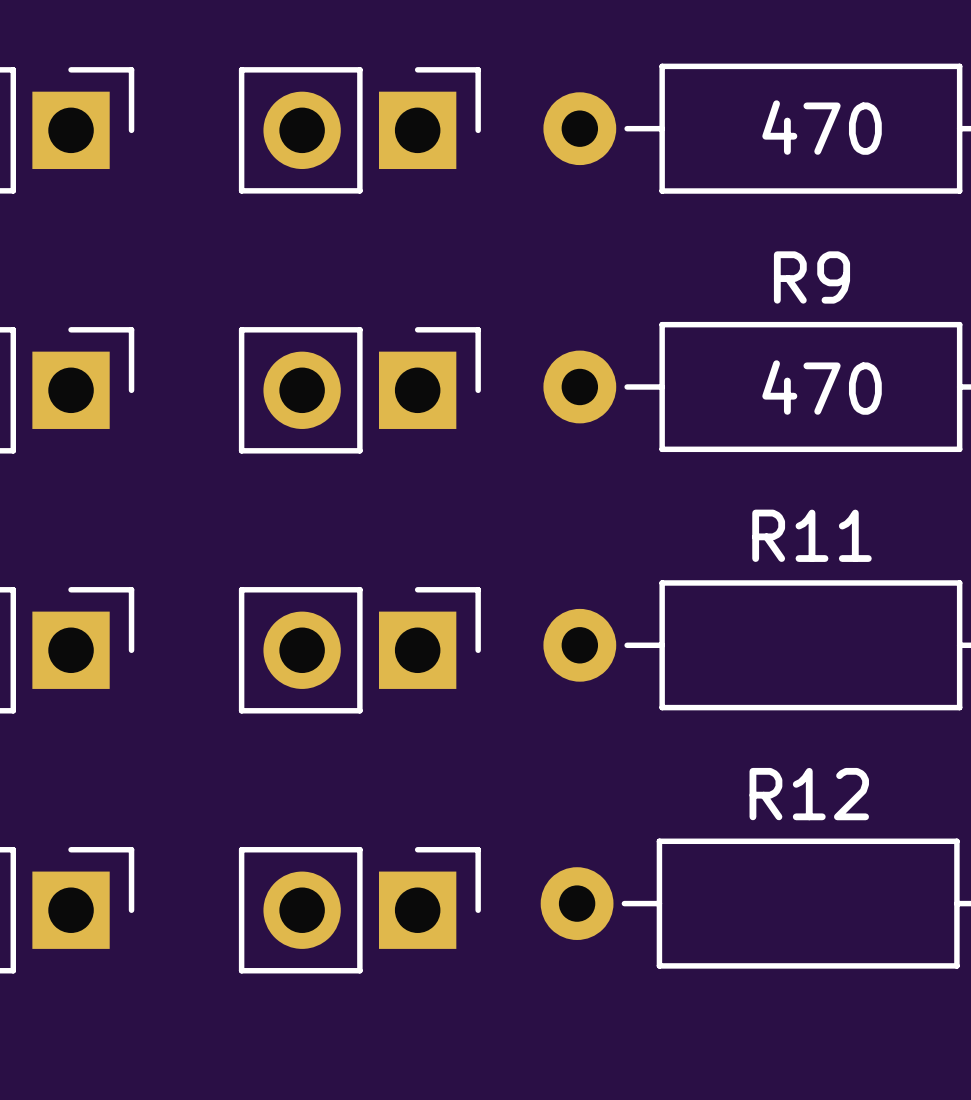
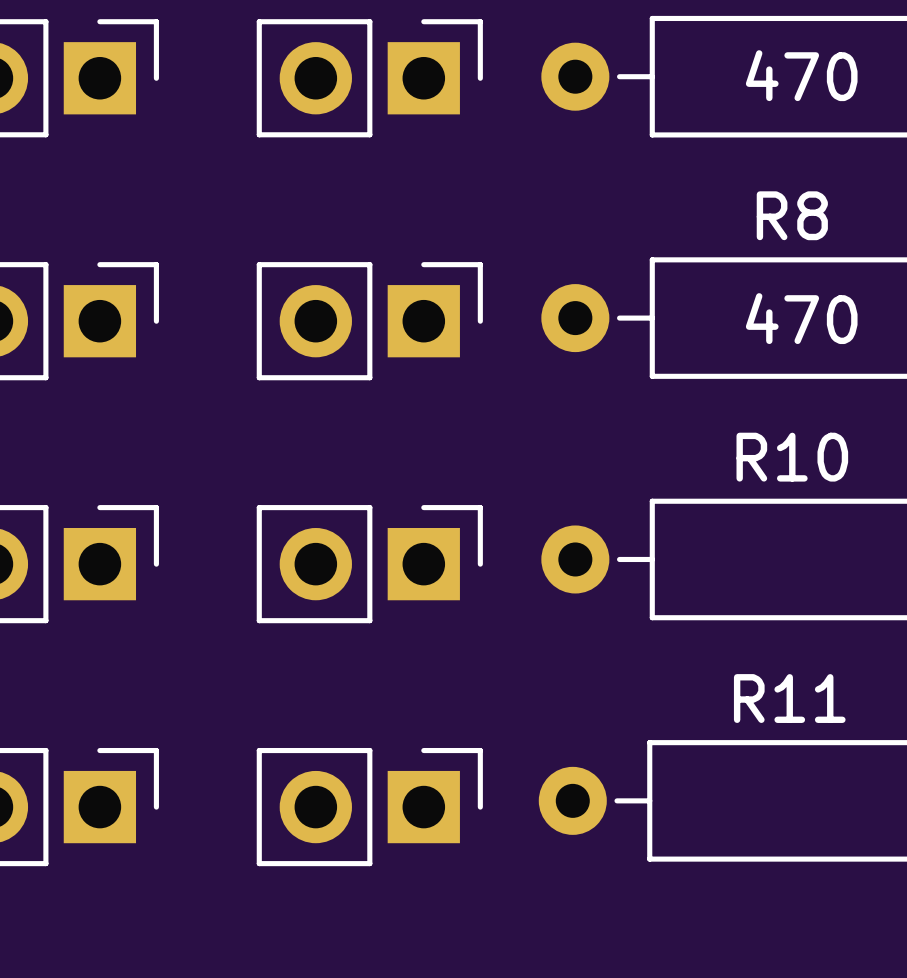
R9 name: R9 (811, 277) -> R8 (792, 215)
R11 name: R11 (811, 535) -> R10 (792, 457)
R12 name: R12 (809, 794) -> R11 (789, 698)

